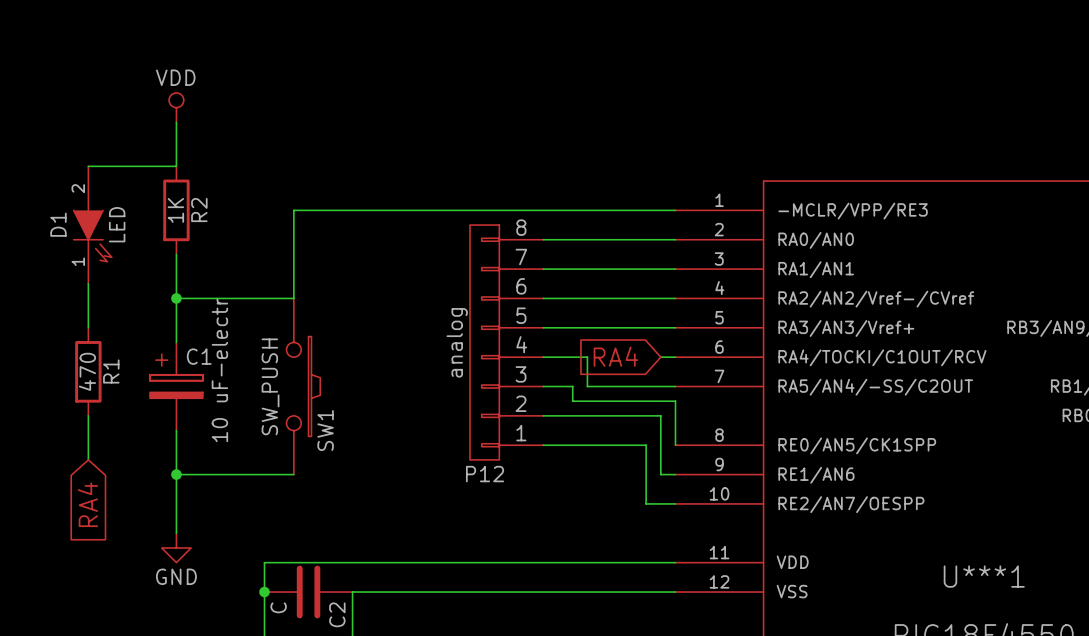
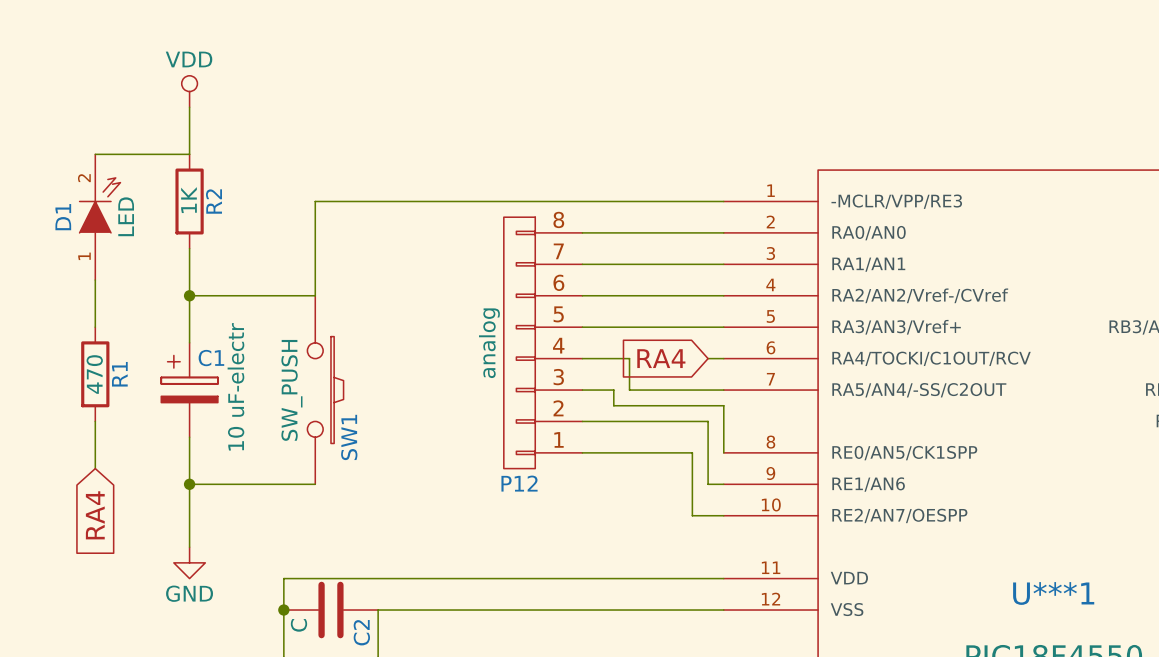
D1 symbol: [73, 166, 112, 284] -> [79, 154, 121, 281]

